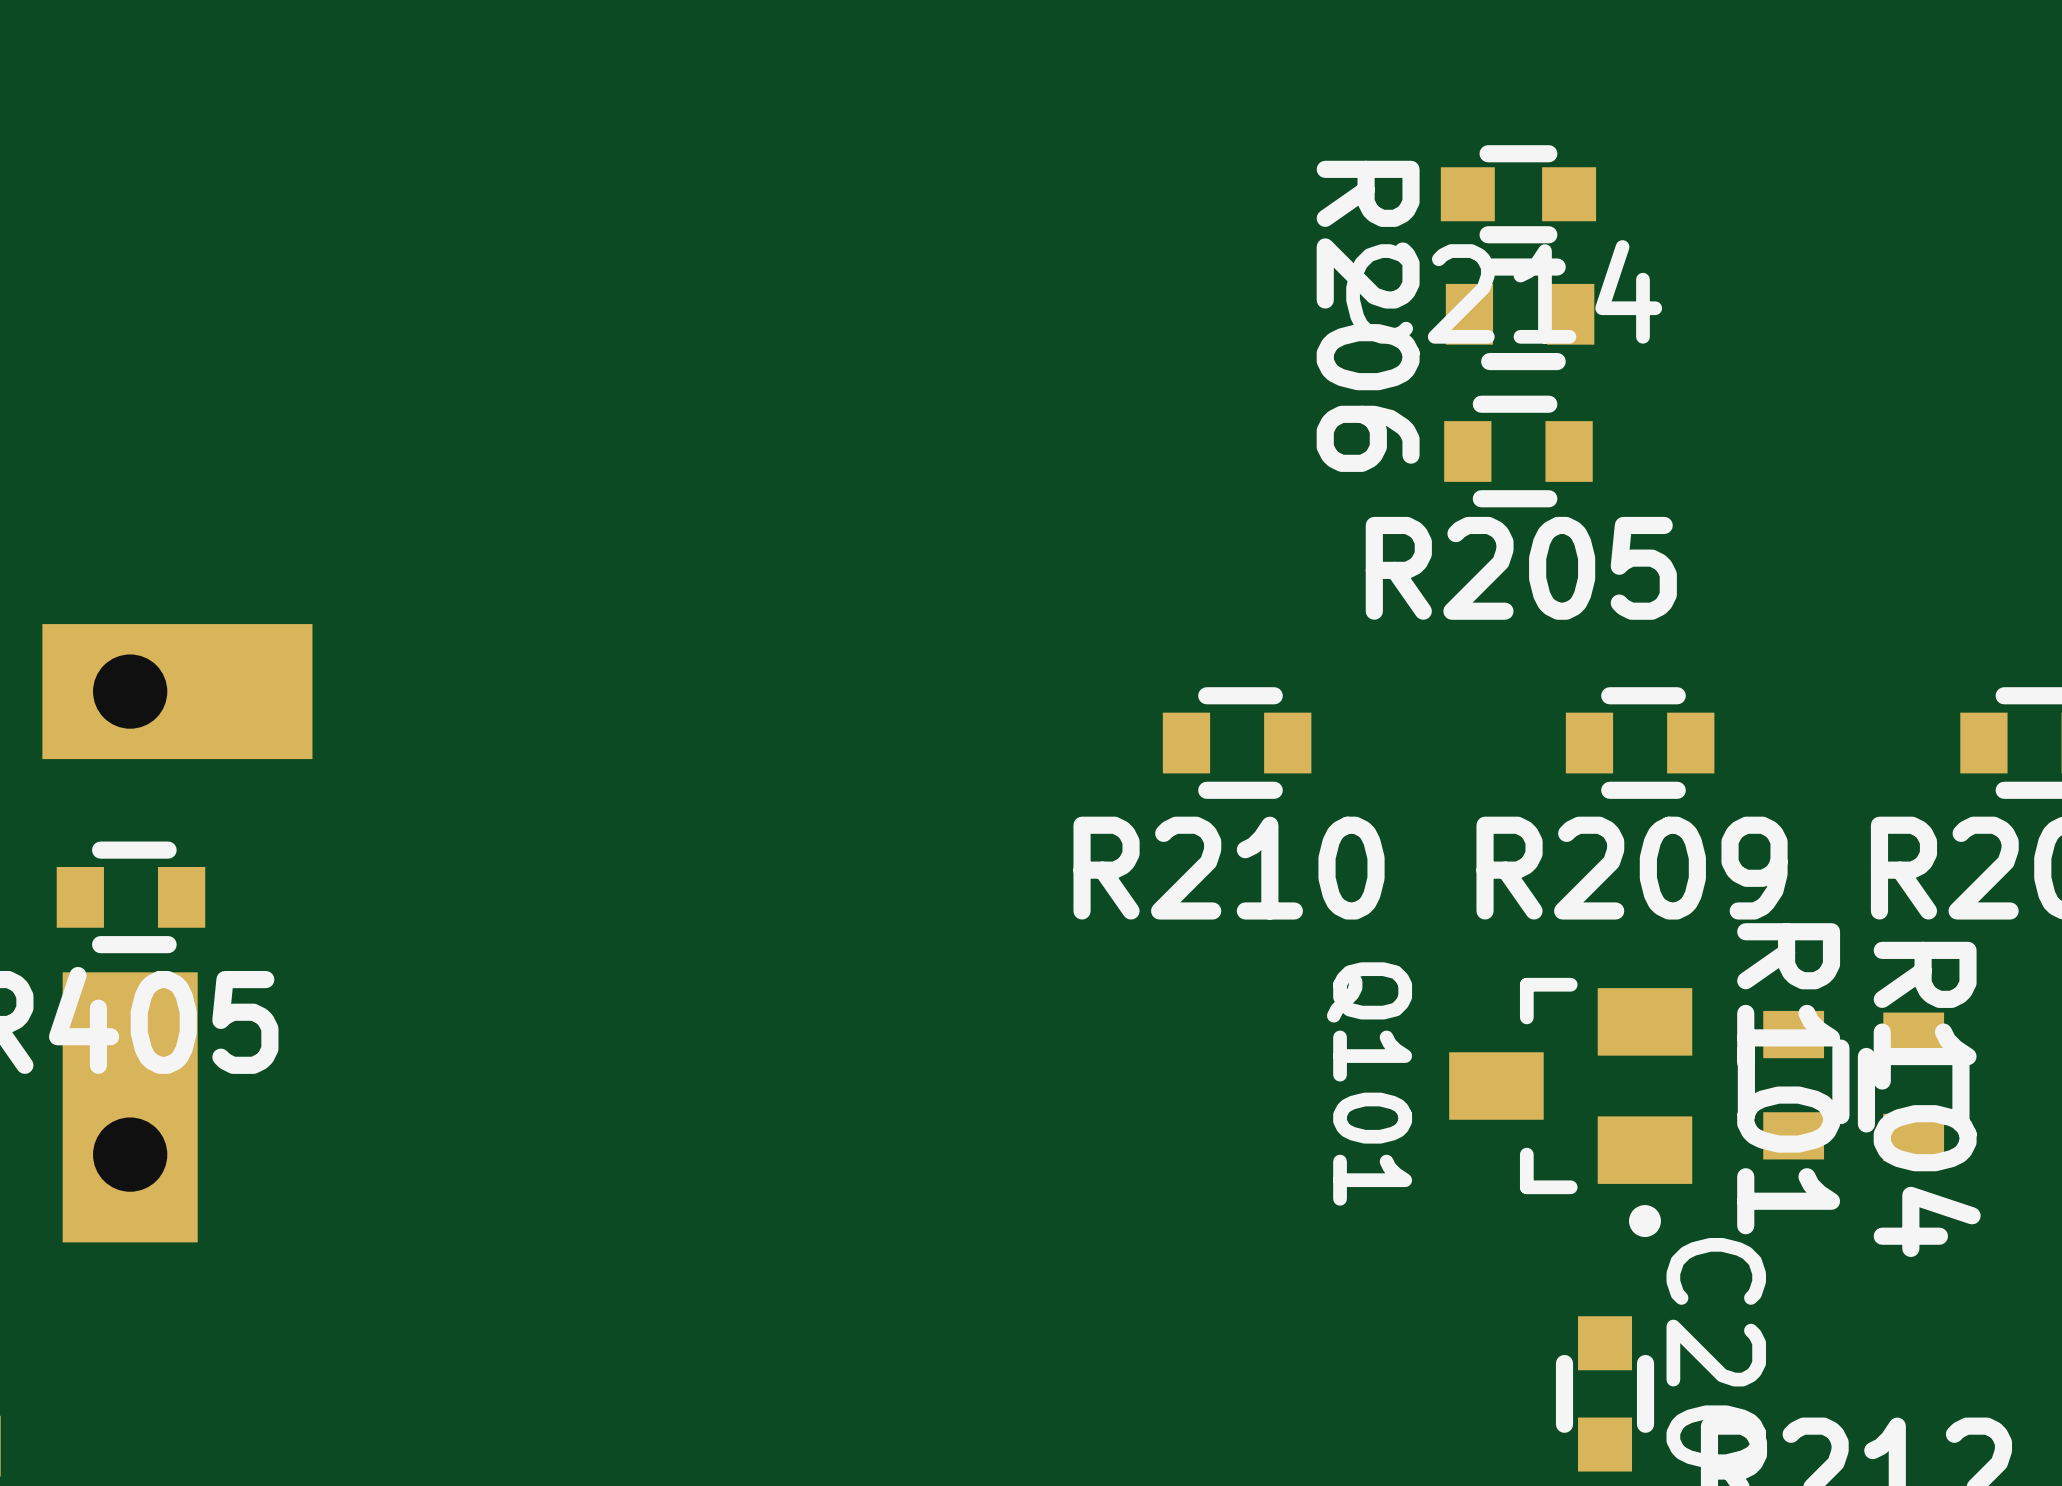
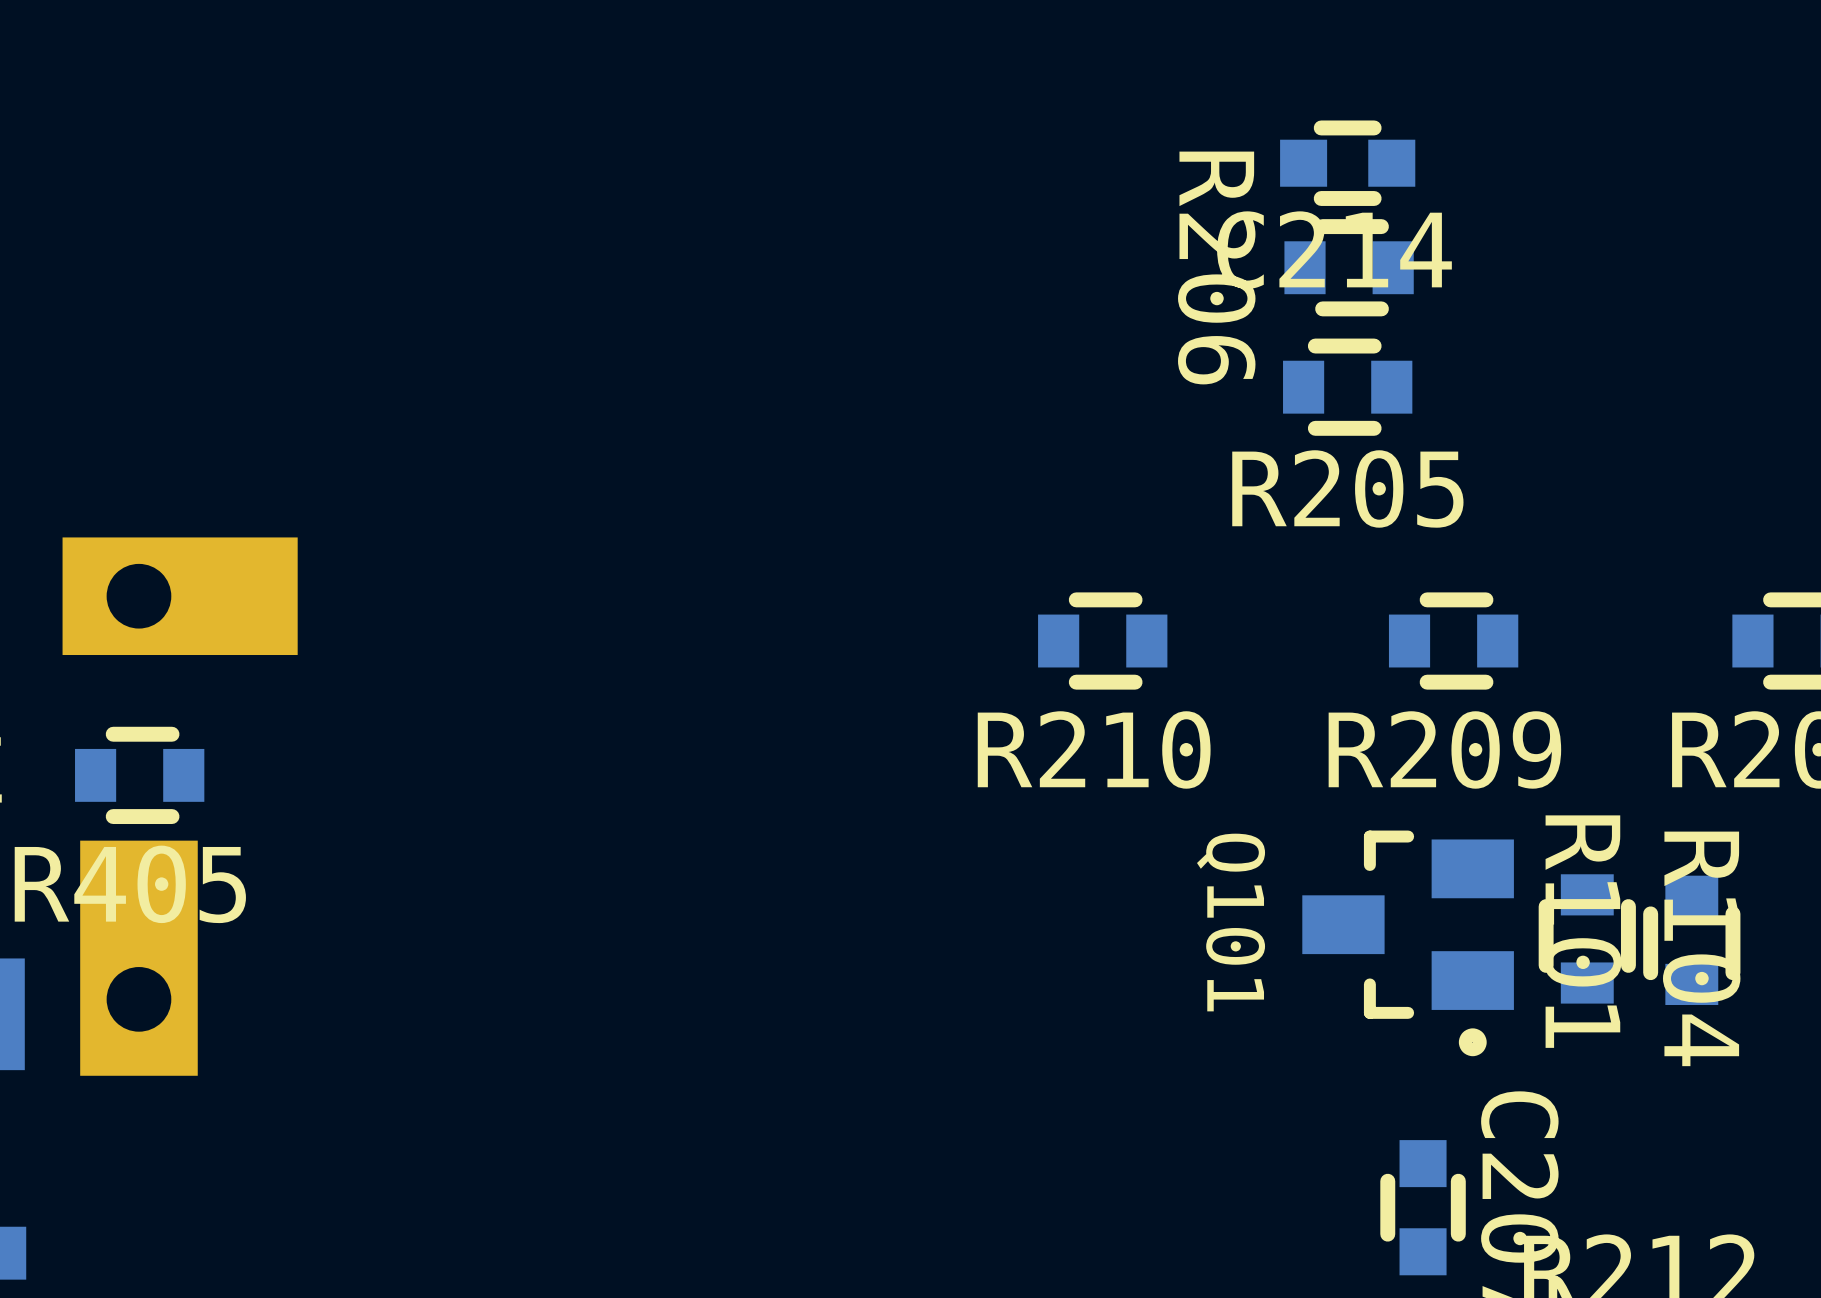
Q101 position: (1570, 1107) -> (1408, 943)

